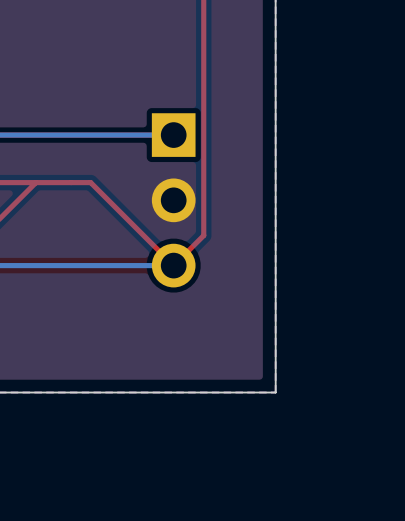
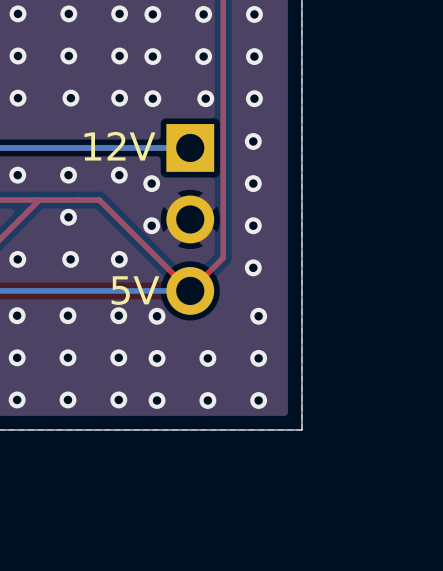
via: none -> (18, 13)
via: none -> (68, 13)
via: none -> (119, 13)
via: none -> (152, 14)
via: none -> (203, 14)
via: none -> (254, 14)
via: none -> (18, 56)
via: none -> (68, 56)
via: none -> (119, 56)
via: none -> (152, 56)
via: none -> (203, 56)
via: none -> (254, 56)
via: none -> (18, 98)
via: none -> (70, 98)
via: none -> (119, 98)
via: none -> (152, 98)
via: none -> (205, 98)
via: none -> (254, 98)
via: none -> (253, 141)
text: none -> 12V (119, 146)
via: none -> (17, 175)
via: none -> (68, 175)
via: none -> (119, 175)
via: none -> (151, 183)
via: none -> (253, 183)
via: none -> (68, 217)
via: none -> (151, 225)
via: none -> (253, 225)
via: none -> (17, 259)
via: none -> (70, 259)
via: none -> (119, 259)
via: none -> (253, 267)
text: none -> 5V (135, 290)
via: none -> (17, 315)
via: none -> (67, 315)
via: none -> (118, 315)
via: none -> (157, 316)
via: none -> (258, 316)
via: none -> (17, 357)
via: none -> (67, 357)
via: none -> (118, 357)
via: none -> (157, 358)
via: none -> (207, 358)
via: none -> (258, 358)
via: none -> (17, 399)
via: none -> (67, 399)
via: none -> (118, 399)
via: none -> (157, 400)
via: none -> (207, 400)
via: none -> (258, 400)

